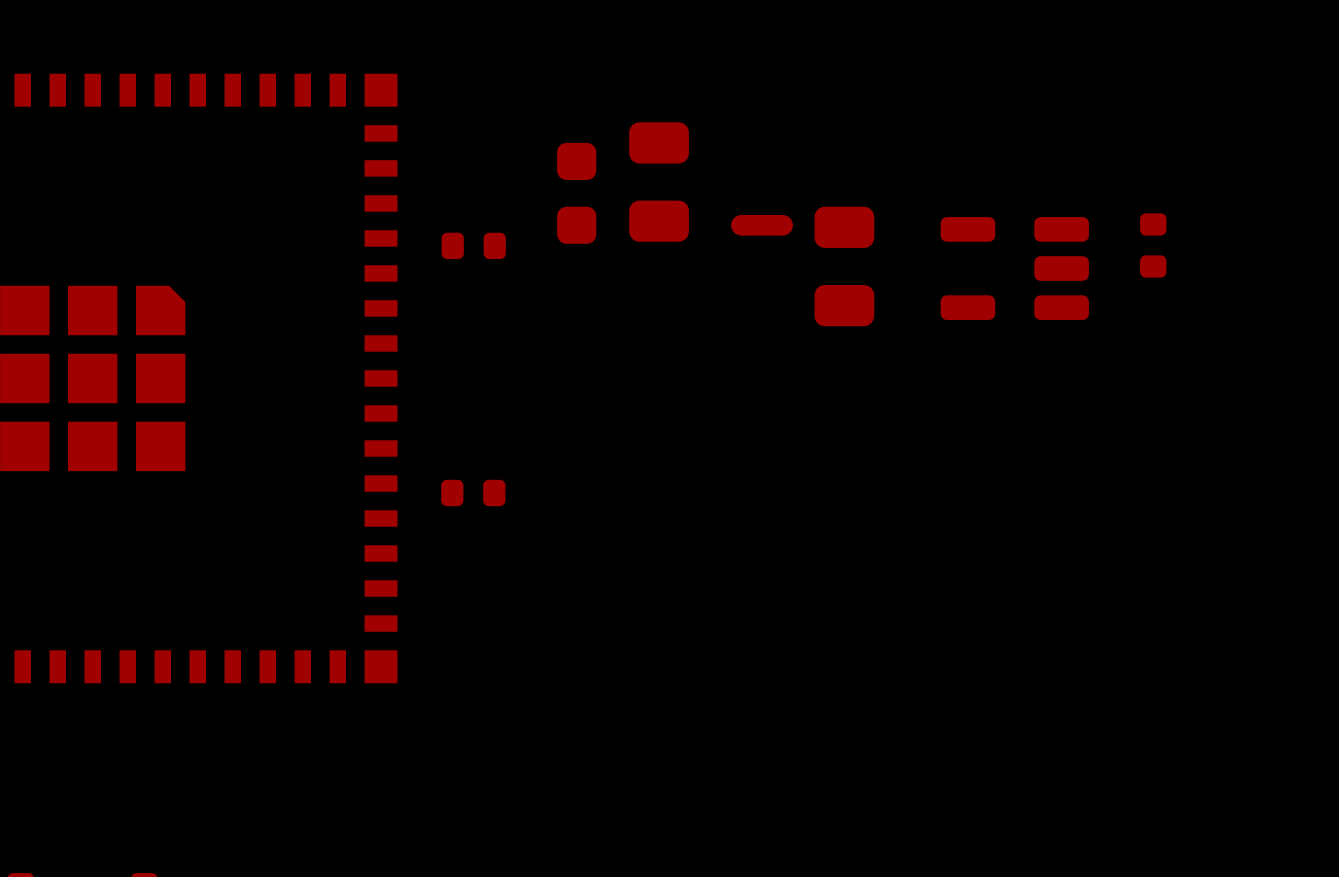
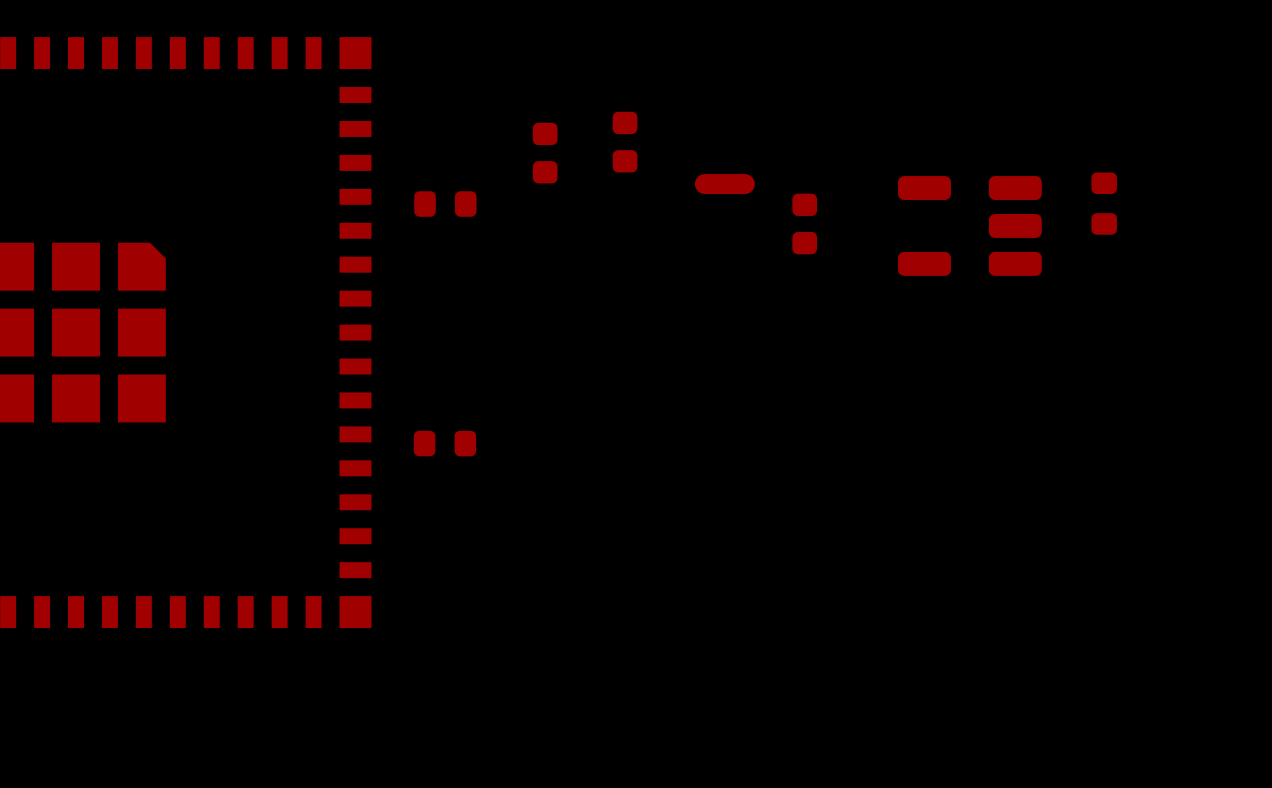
part footprint: [629, 122, 689, 242] -> [612, 111, 638, 173]
part footprint: [557, 142, 597, 244] -> [532, 122, 558, 184]
part footprint: [814, 206, 875, 327] -> [792, 193, 818, 255]

